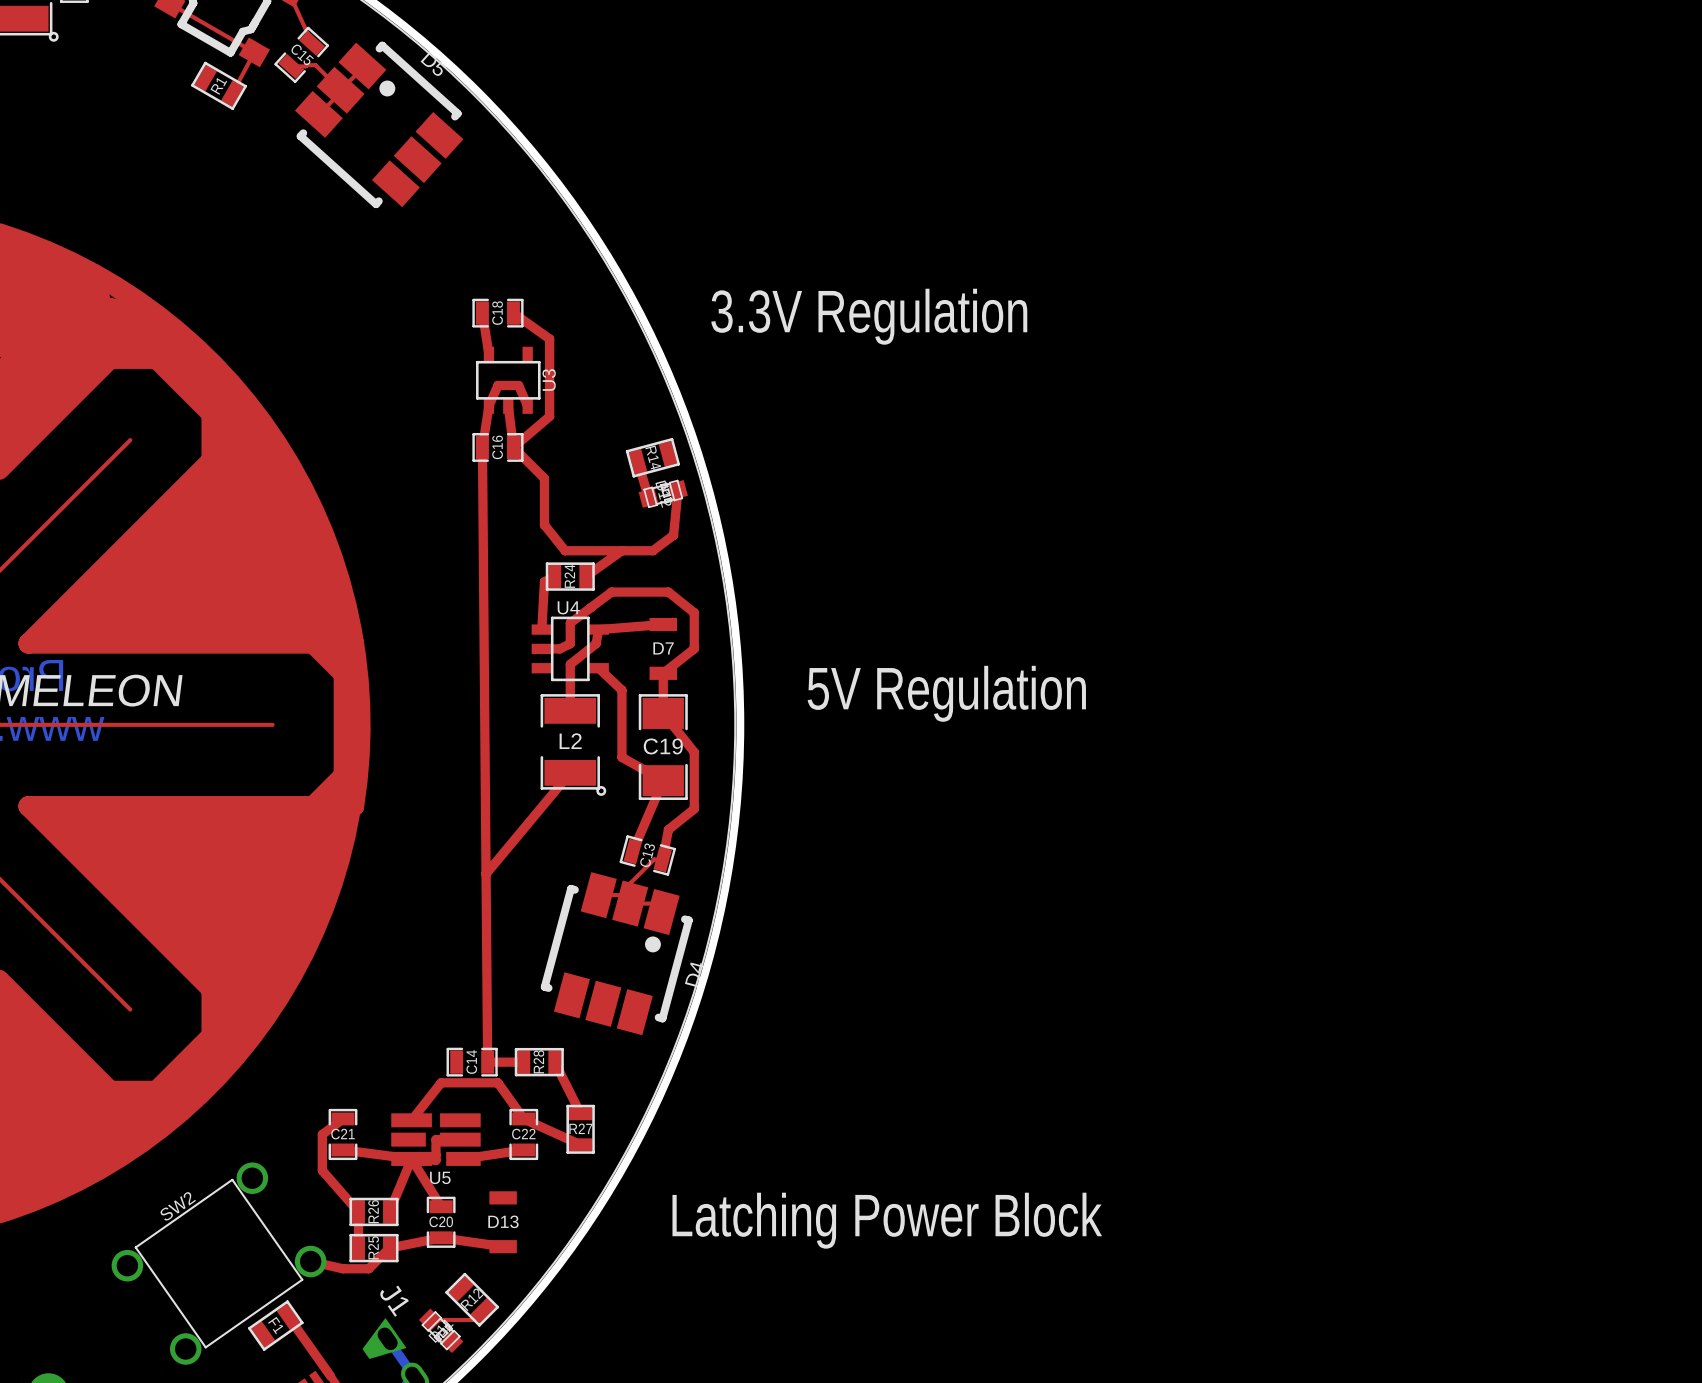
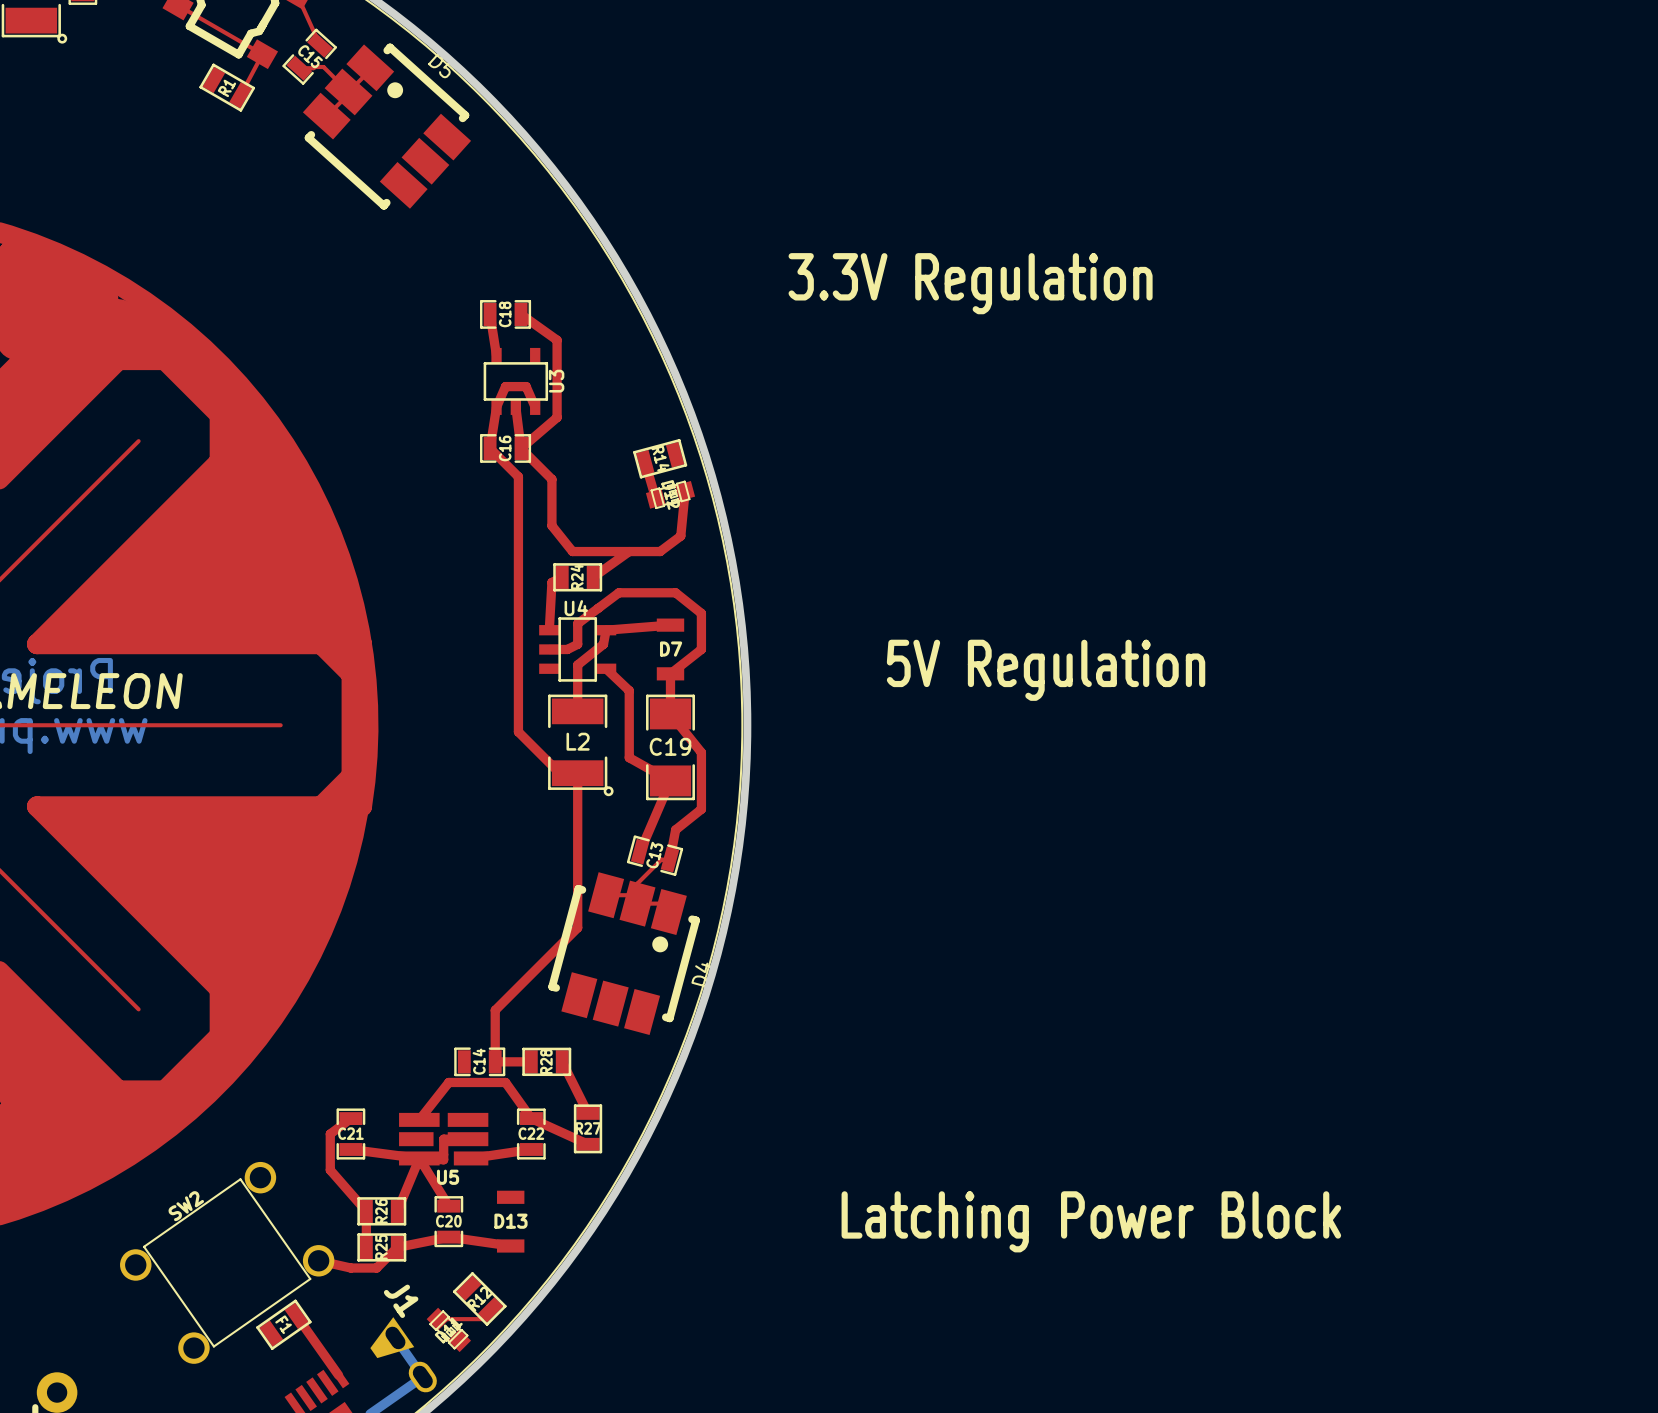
text position: 3.3V Regulation (869, 316) -> 3.3V Regulation (970, 283)
top track: (482, 447) (487, 1062) -> (490, 448) (518, 476) (518, 731) (559, 773) (577, 773) (577, 927) (495, 1010) (495, 1061)
text position: 5V Regulation (946, 693) -> 5V Regulation (1046, 670)
top track: (570, 772) (486, 873) -> none
text position: Latching Power Block (887, 1220) -> Latching Power Block (1091, 1221)

